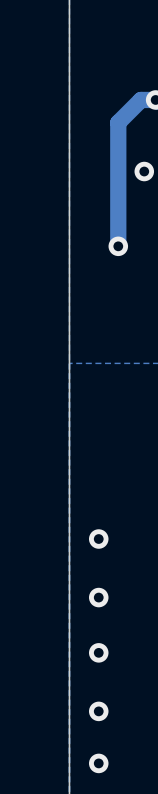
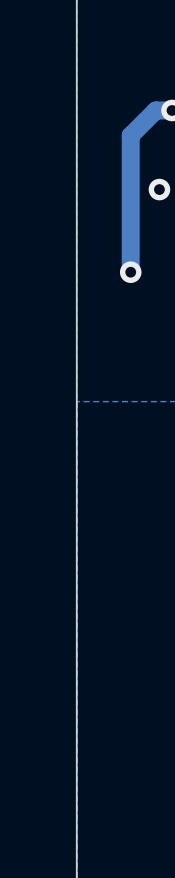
via: (98, 539) -> none
via: (98, 597) -> none
via: (98, 652) -> none
via: (98, 711) -> none
via: (98, 763) -> none

